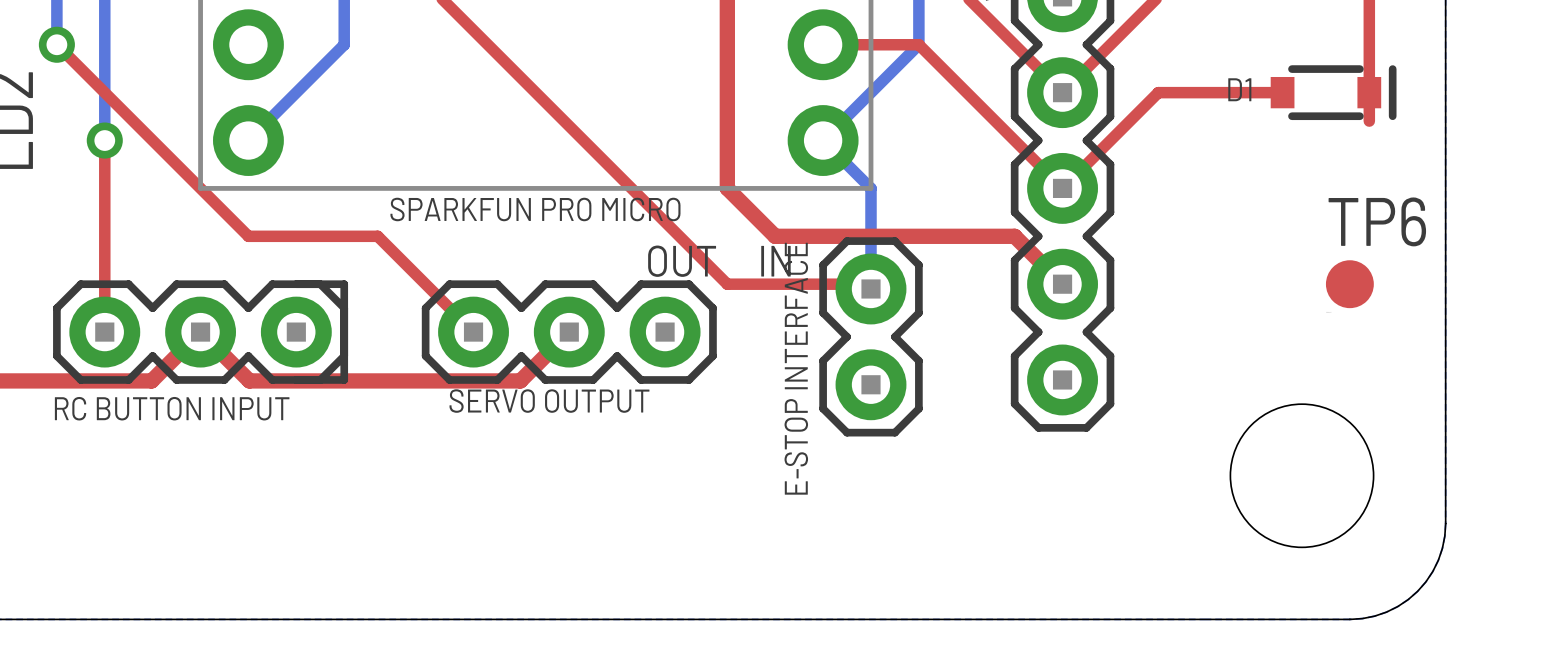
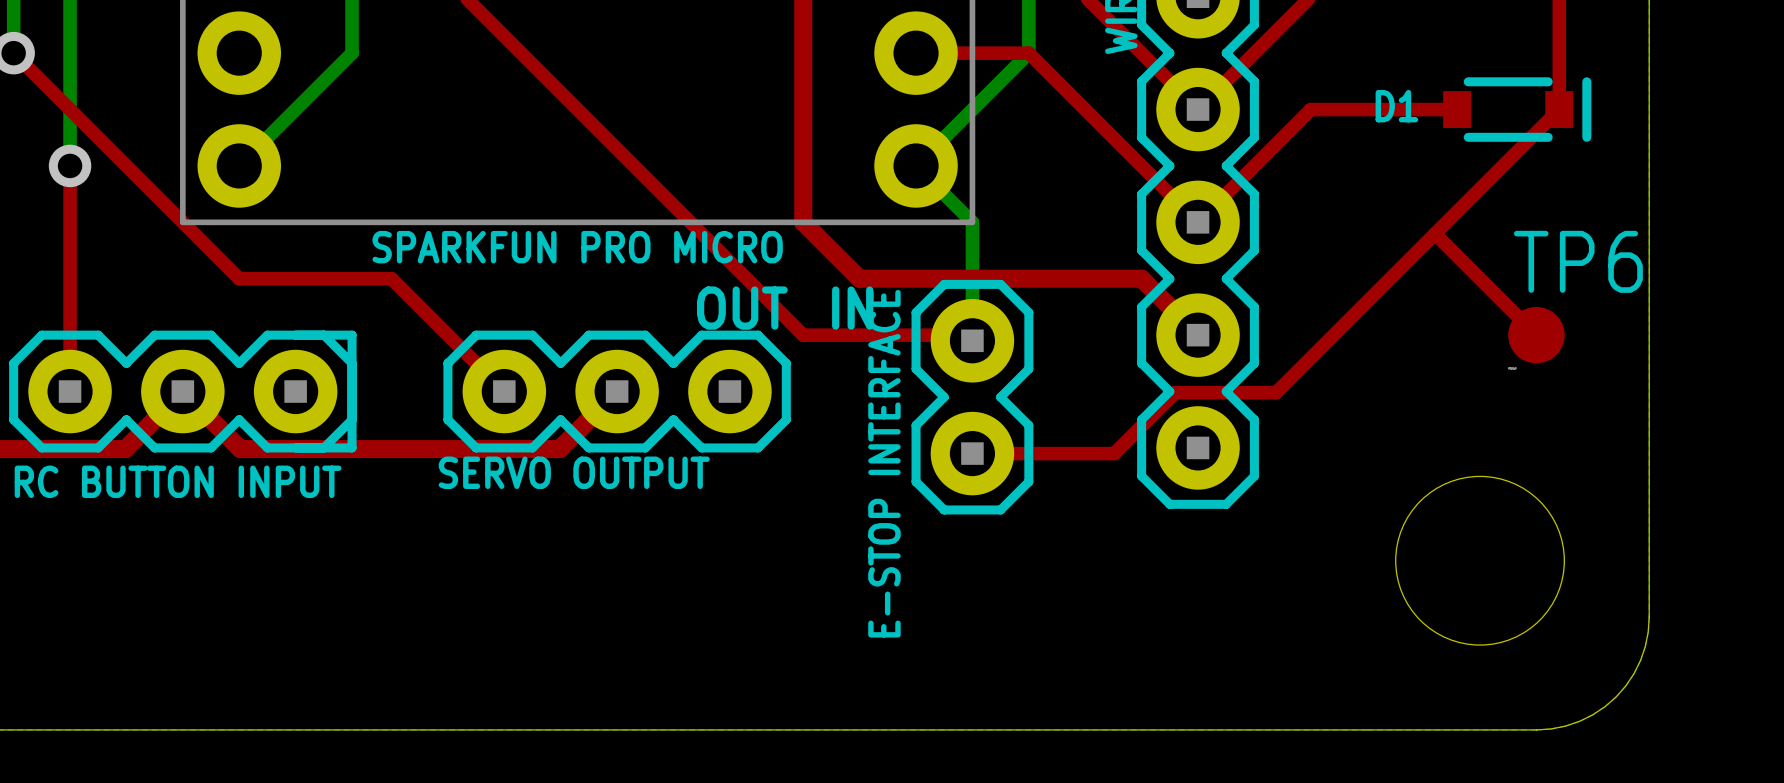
top track: (1369, 92) (1369, 121) -> (1559, 109) (1276, 392) (1175, 392) (1114, 453) (972, 453)
top track: none -> (1435, 233) (1536, 335)

